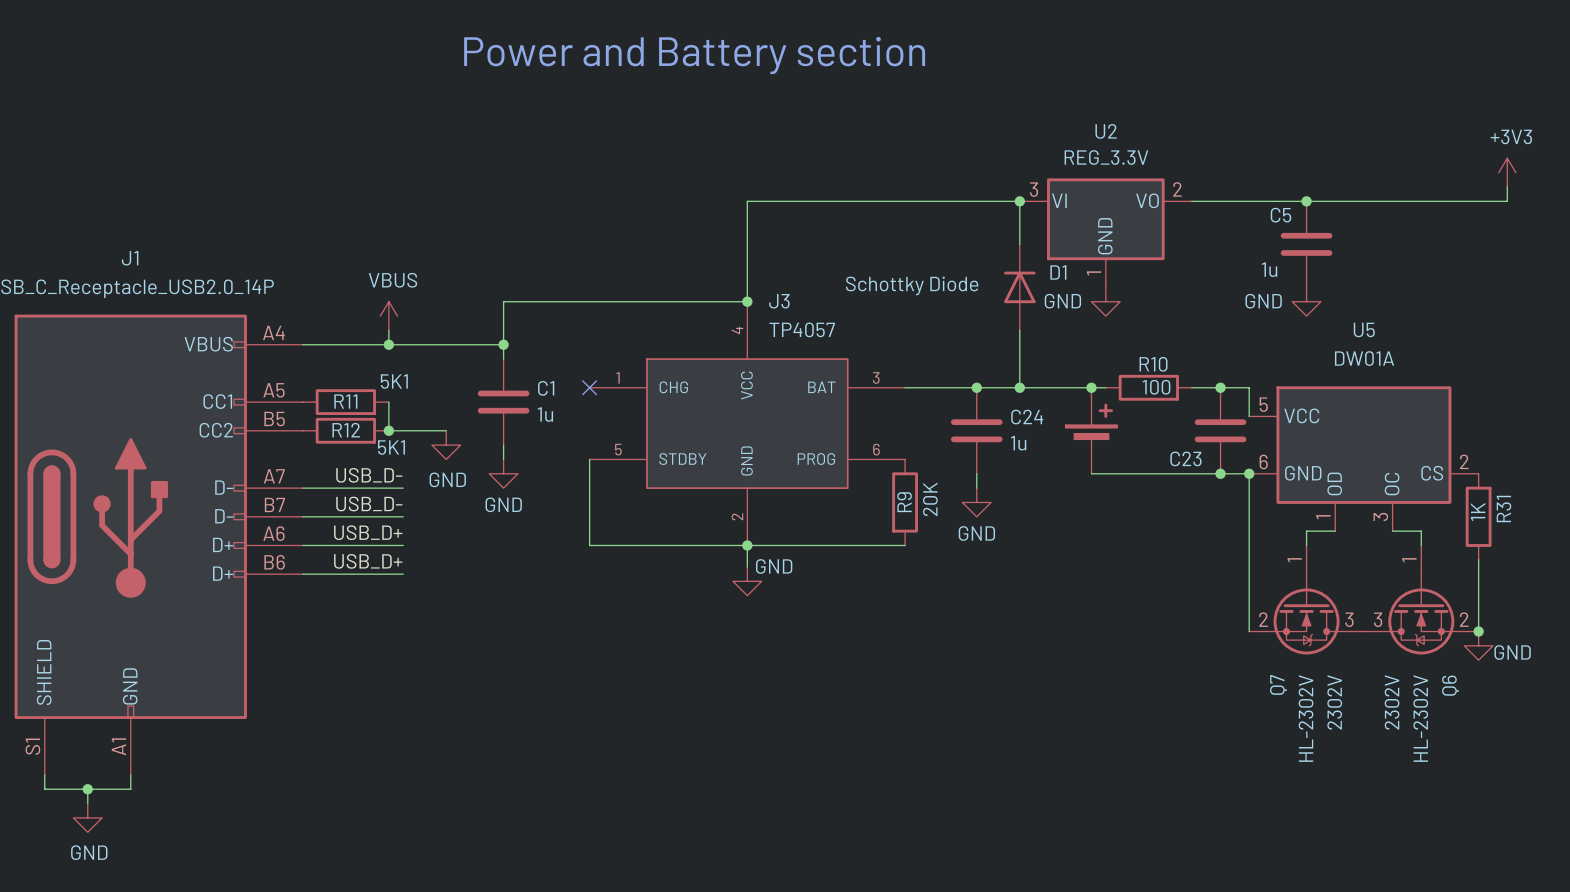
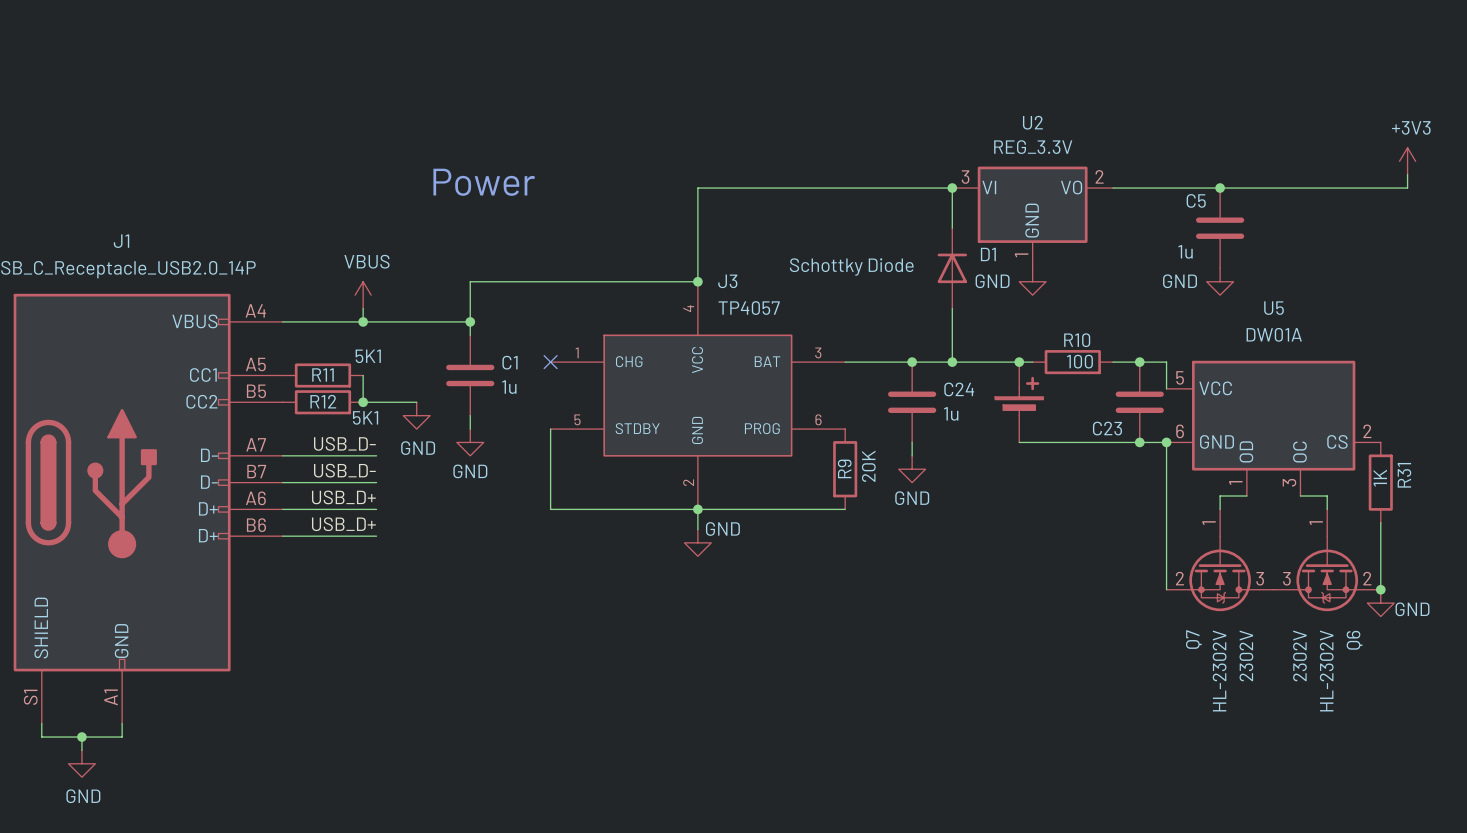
text: Power and Battery section (694, 55) -> none
text: none -> Power (484, 182)

